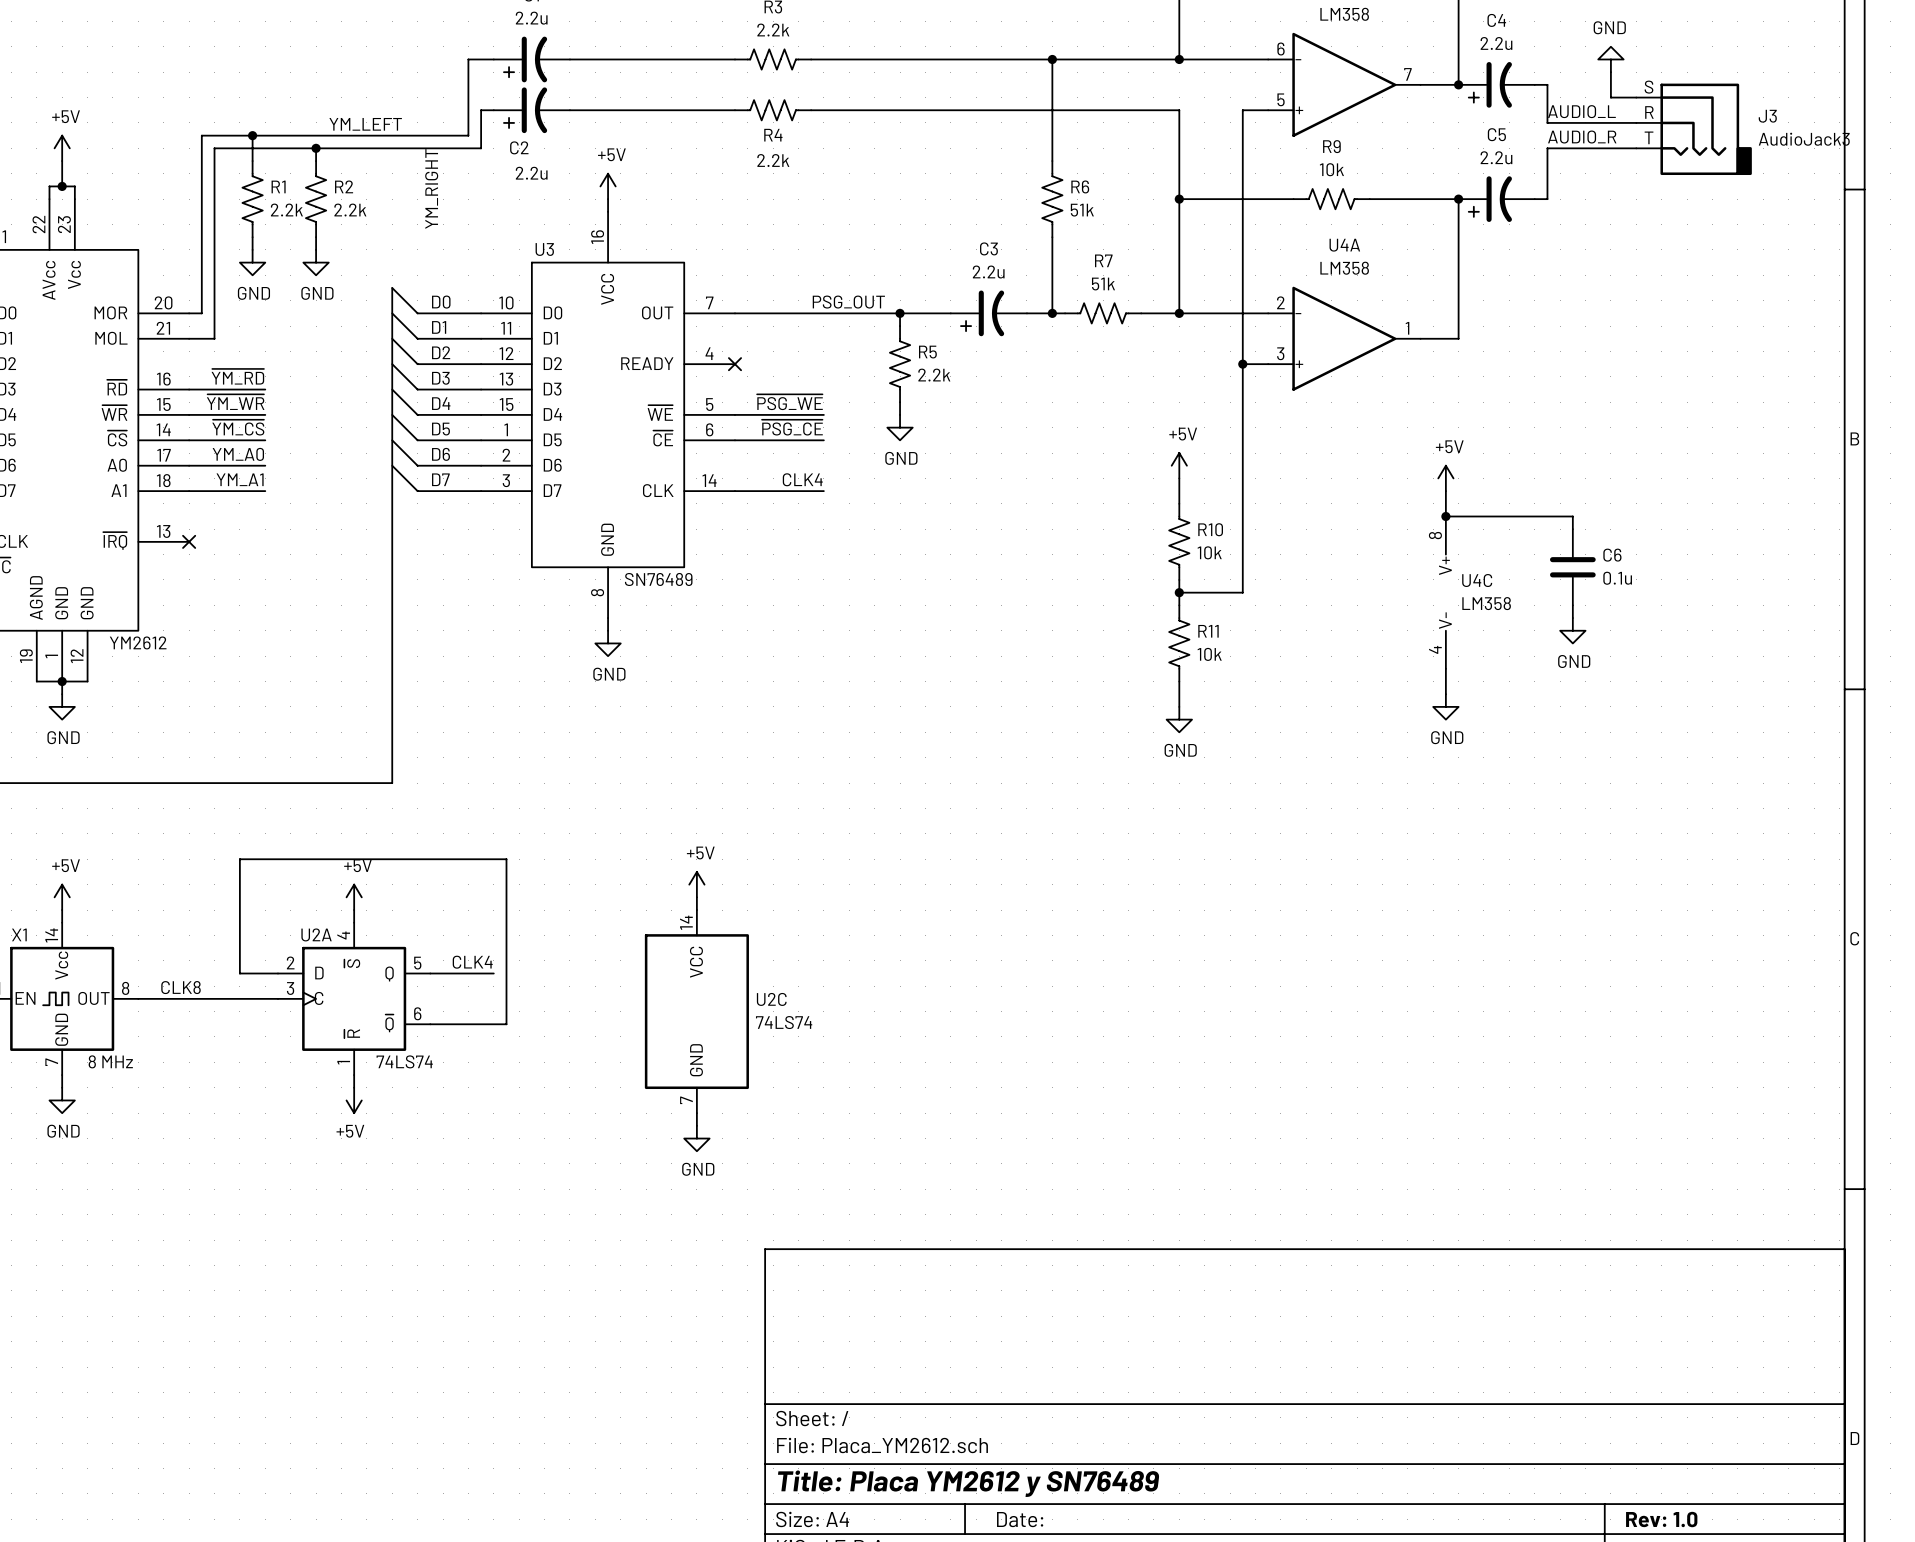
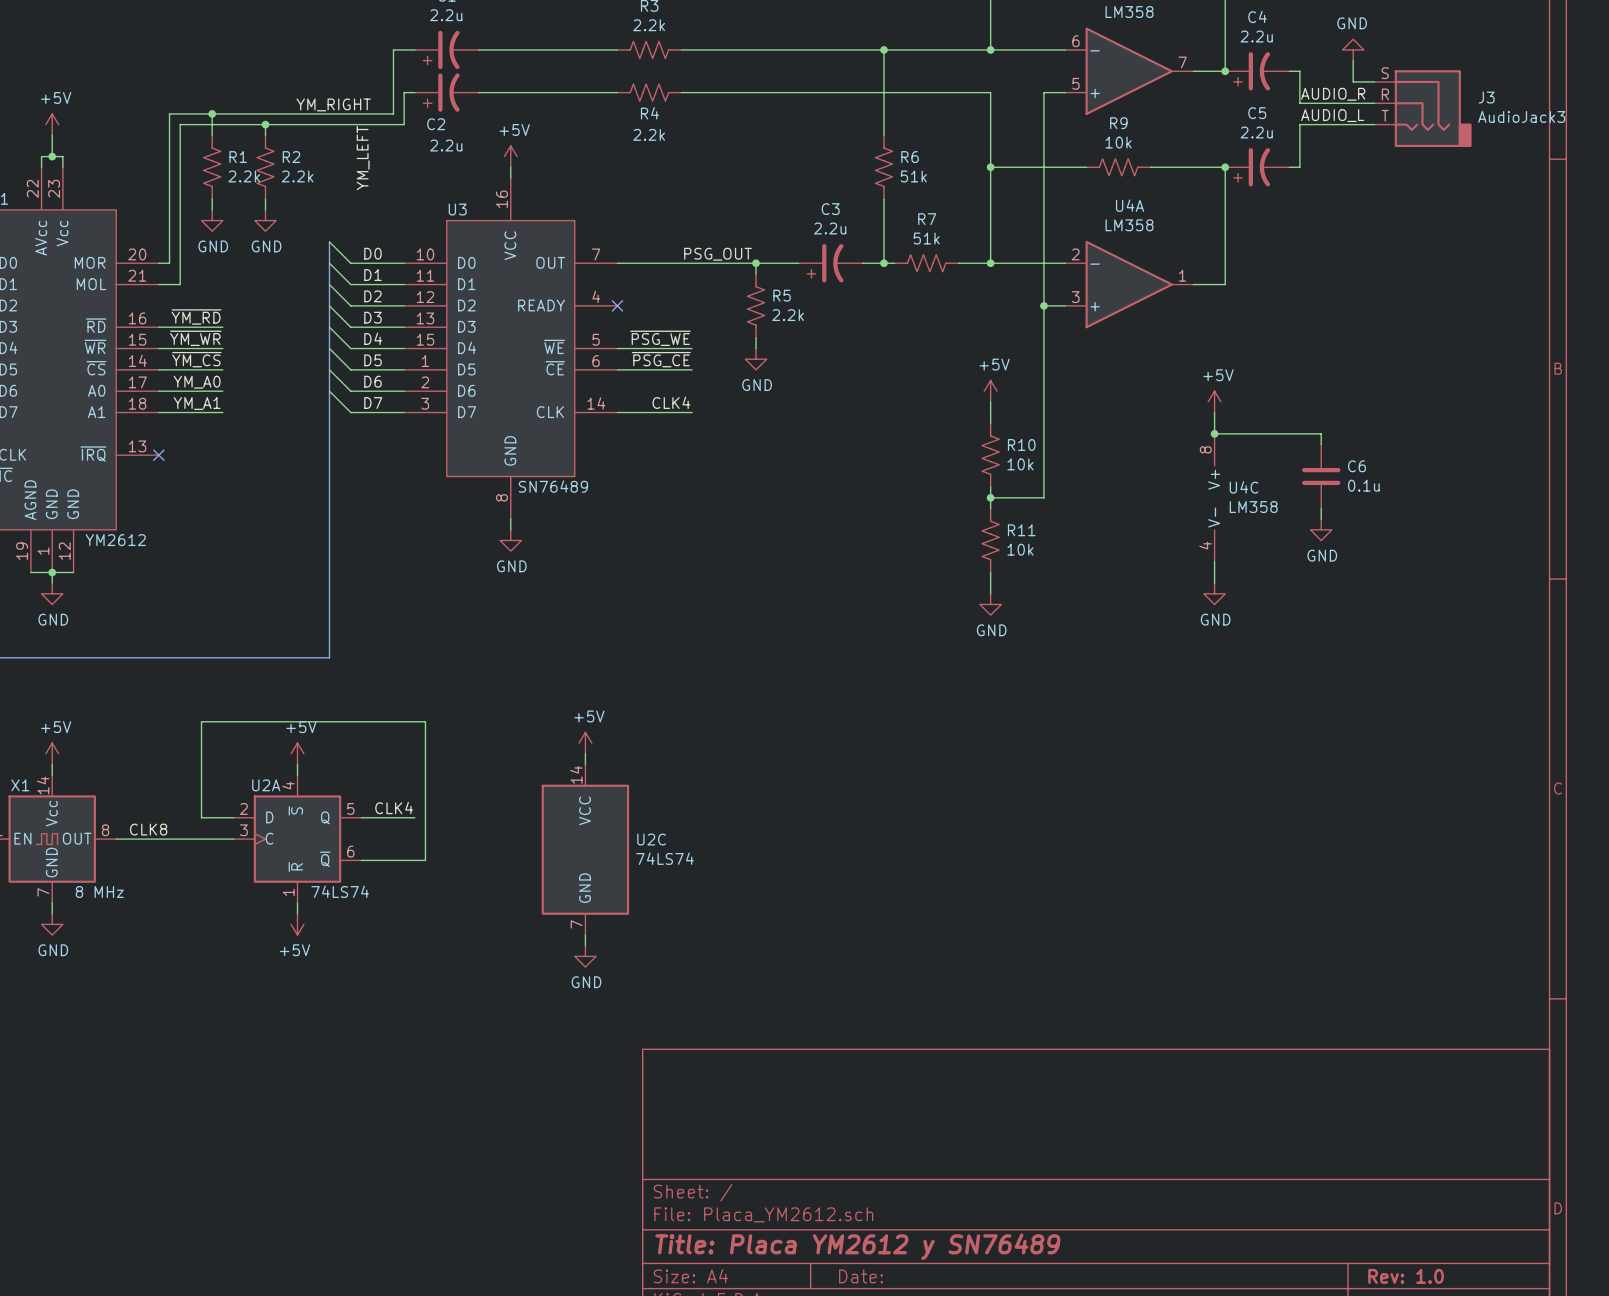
label: AUDIO_L (1581, 111) -> AUDIO_R (1333, 94)
label: YM_LEFT (365, 124) -> none
label: none -> YM_RIGHT (333, 104)
label: AUDIO_R (1582, 137) -> AUDIO_L (1332, 115)
label: YM_RIGHT (431, 188) -> YM_LEFT (363, 157)

